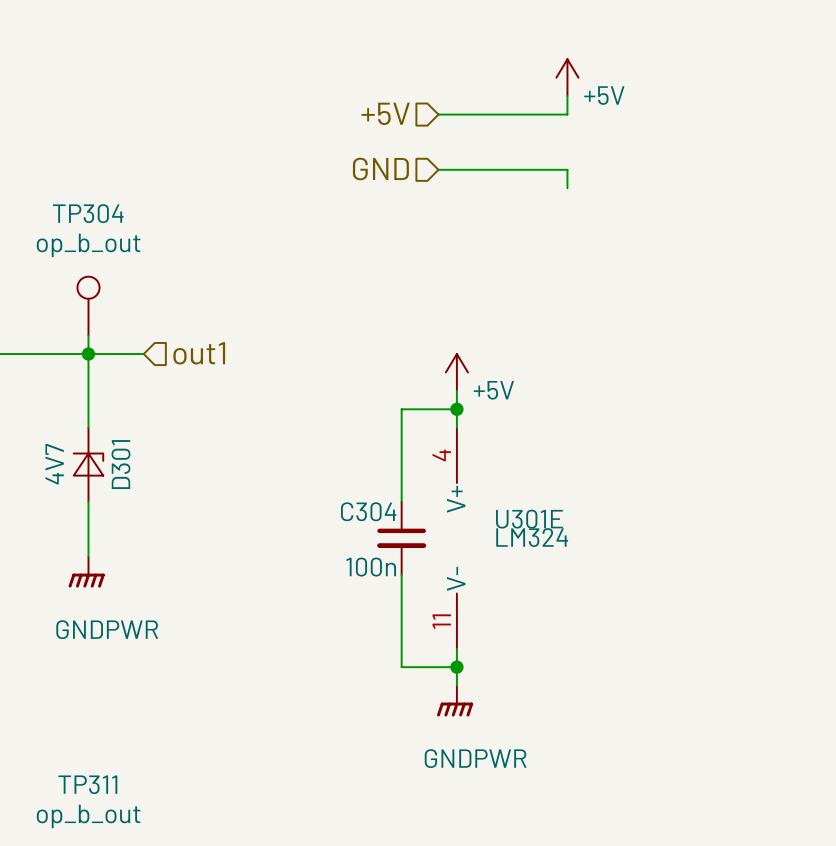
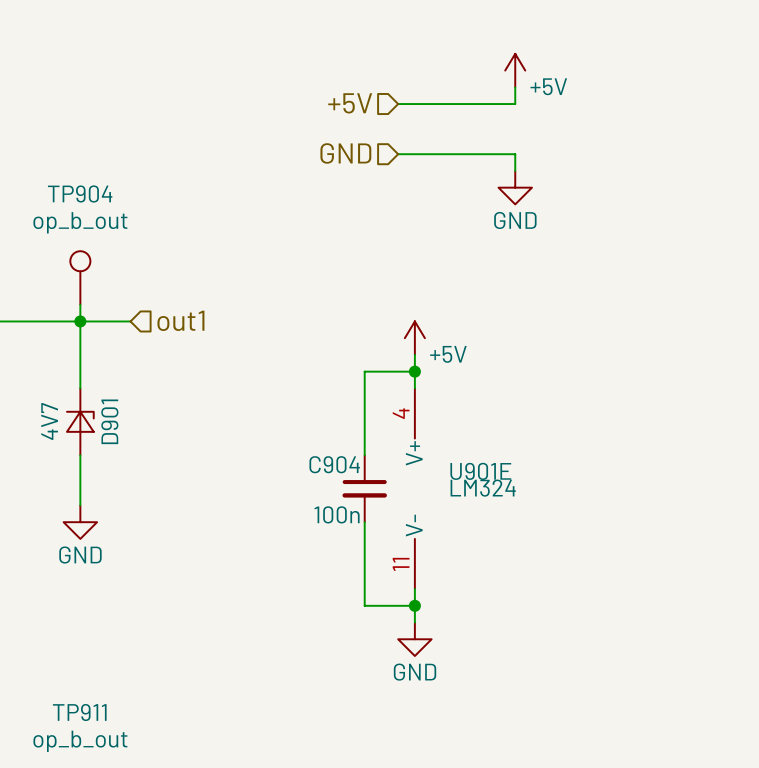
power symbol: none -> GND (515, 187)
TP304 name: TP304 (88, 213) -> TP904 (80, 193)
D301 name: D301 (120, 464) -> D901 (109, 421)
C304 name: C304 (368, 511) -> C904 (334, 464)
U301E name: U301E (529, 519) -> U901E (480, 471)
power symbol: GNDPWR (86, 572) -> GND (80, 522)
power symbol: GNDPWR (455, 701) -> GND (414, 639)
TP311 name: TP311 (87, 784) -> TP911 (79, 712)

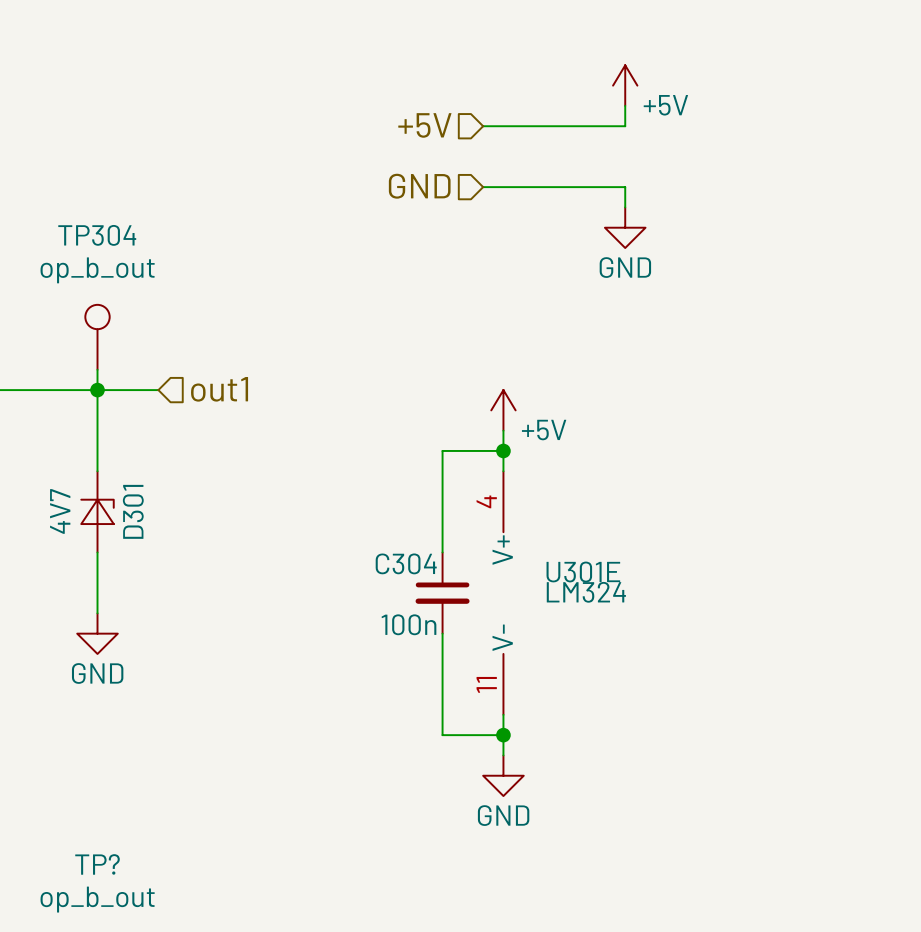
TP904 name: TP904 (80, 193) -> TP304 (97, 235)
D901 name: D901 (109, 421) -> D301 (133, 511)
C904 name: C904 (334, 464) -> C304 (406, 563)
U901E name: U901E (480, 471) -> U301E (583, 572)
TP911 name: TP911 (79, 712) -> TP? (97, 864)

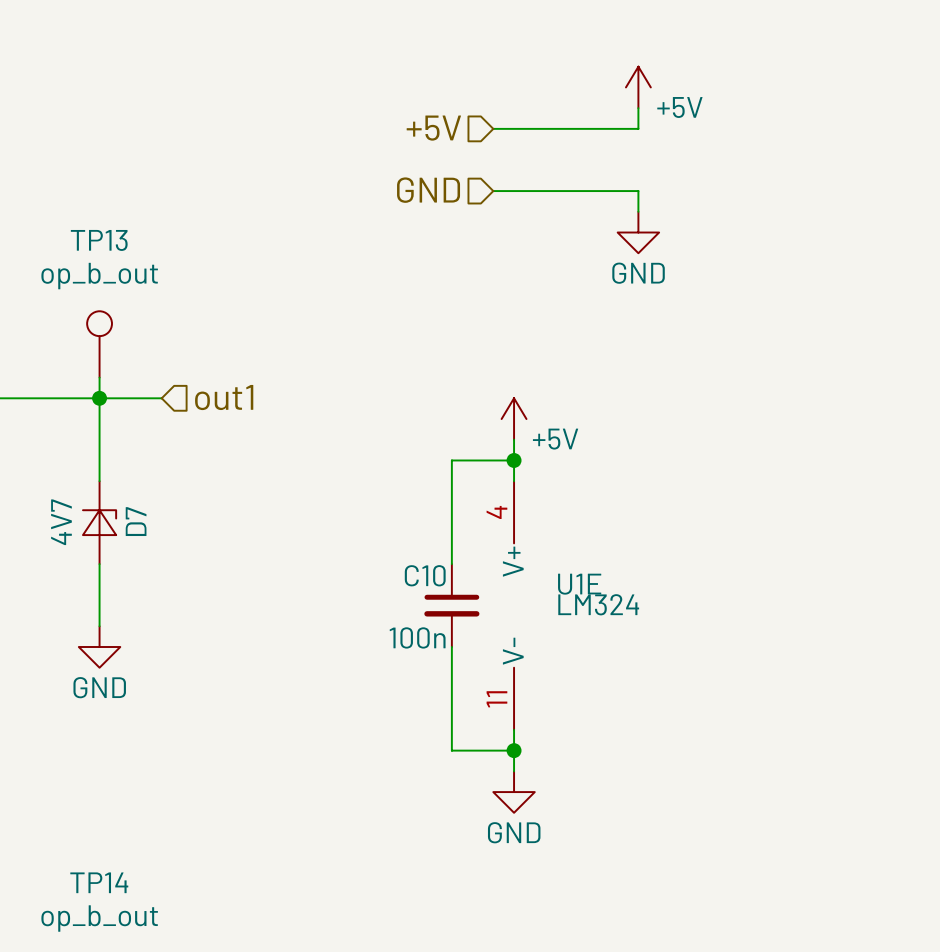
TP304 name: TP304 (97, 235) -> TP13 (99, 240)
D301 name: D301 (133, 511) -> D7 (136, 521)
C304 name: C304 (406, 563) -> C10 (425, 575)
U301E name: U301E (583, 572) -> U1E (579, 584)
TP? name: TP? (97, 864) -> TP14 (99, 882)

